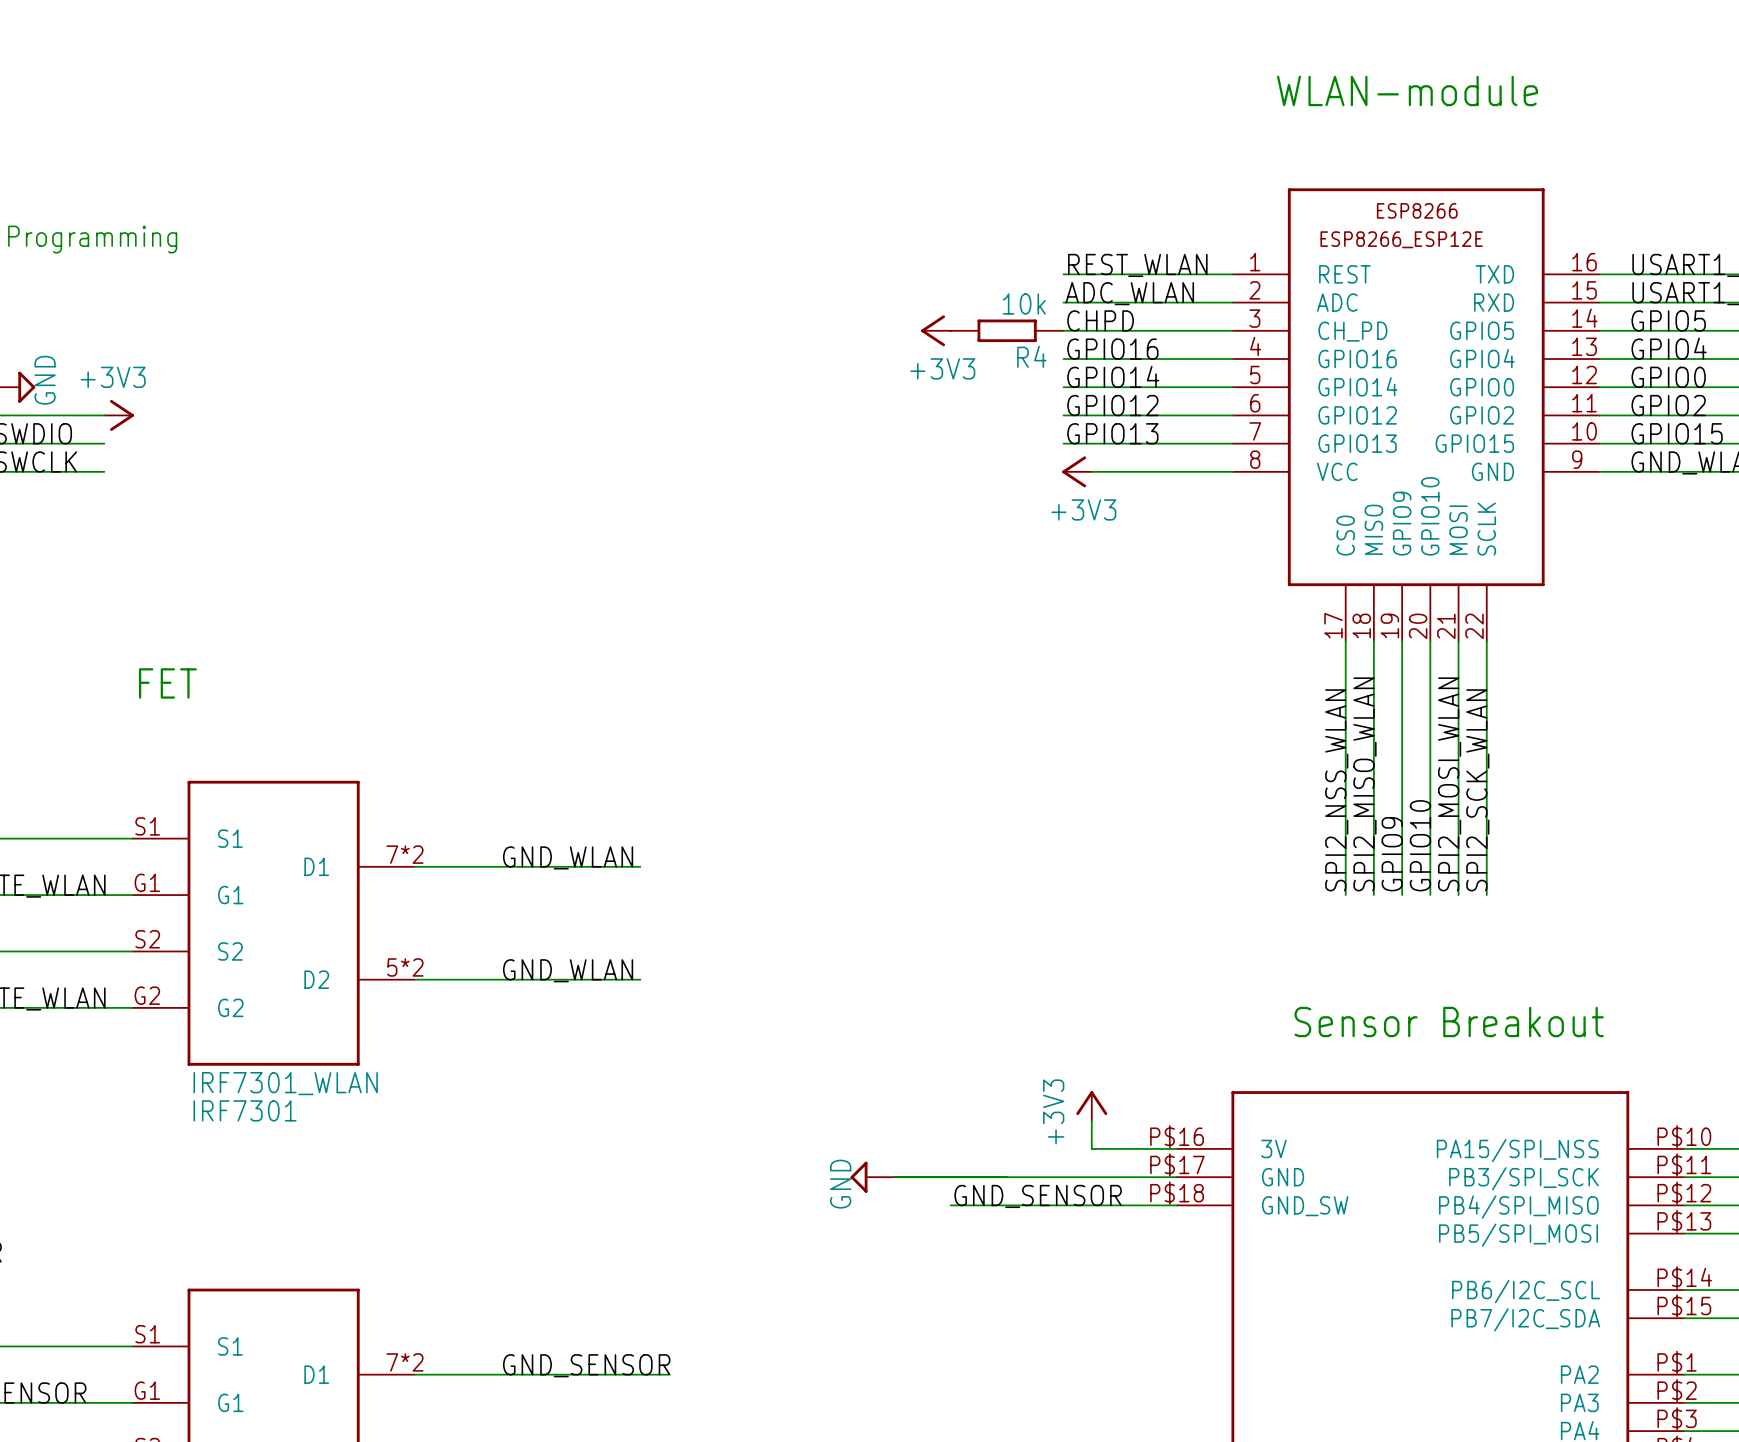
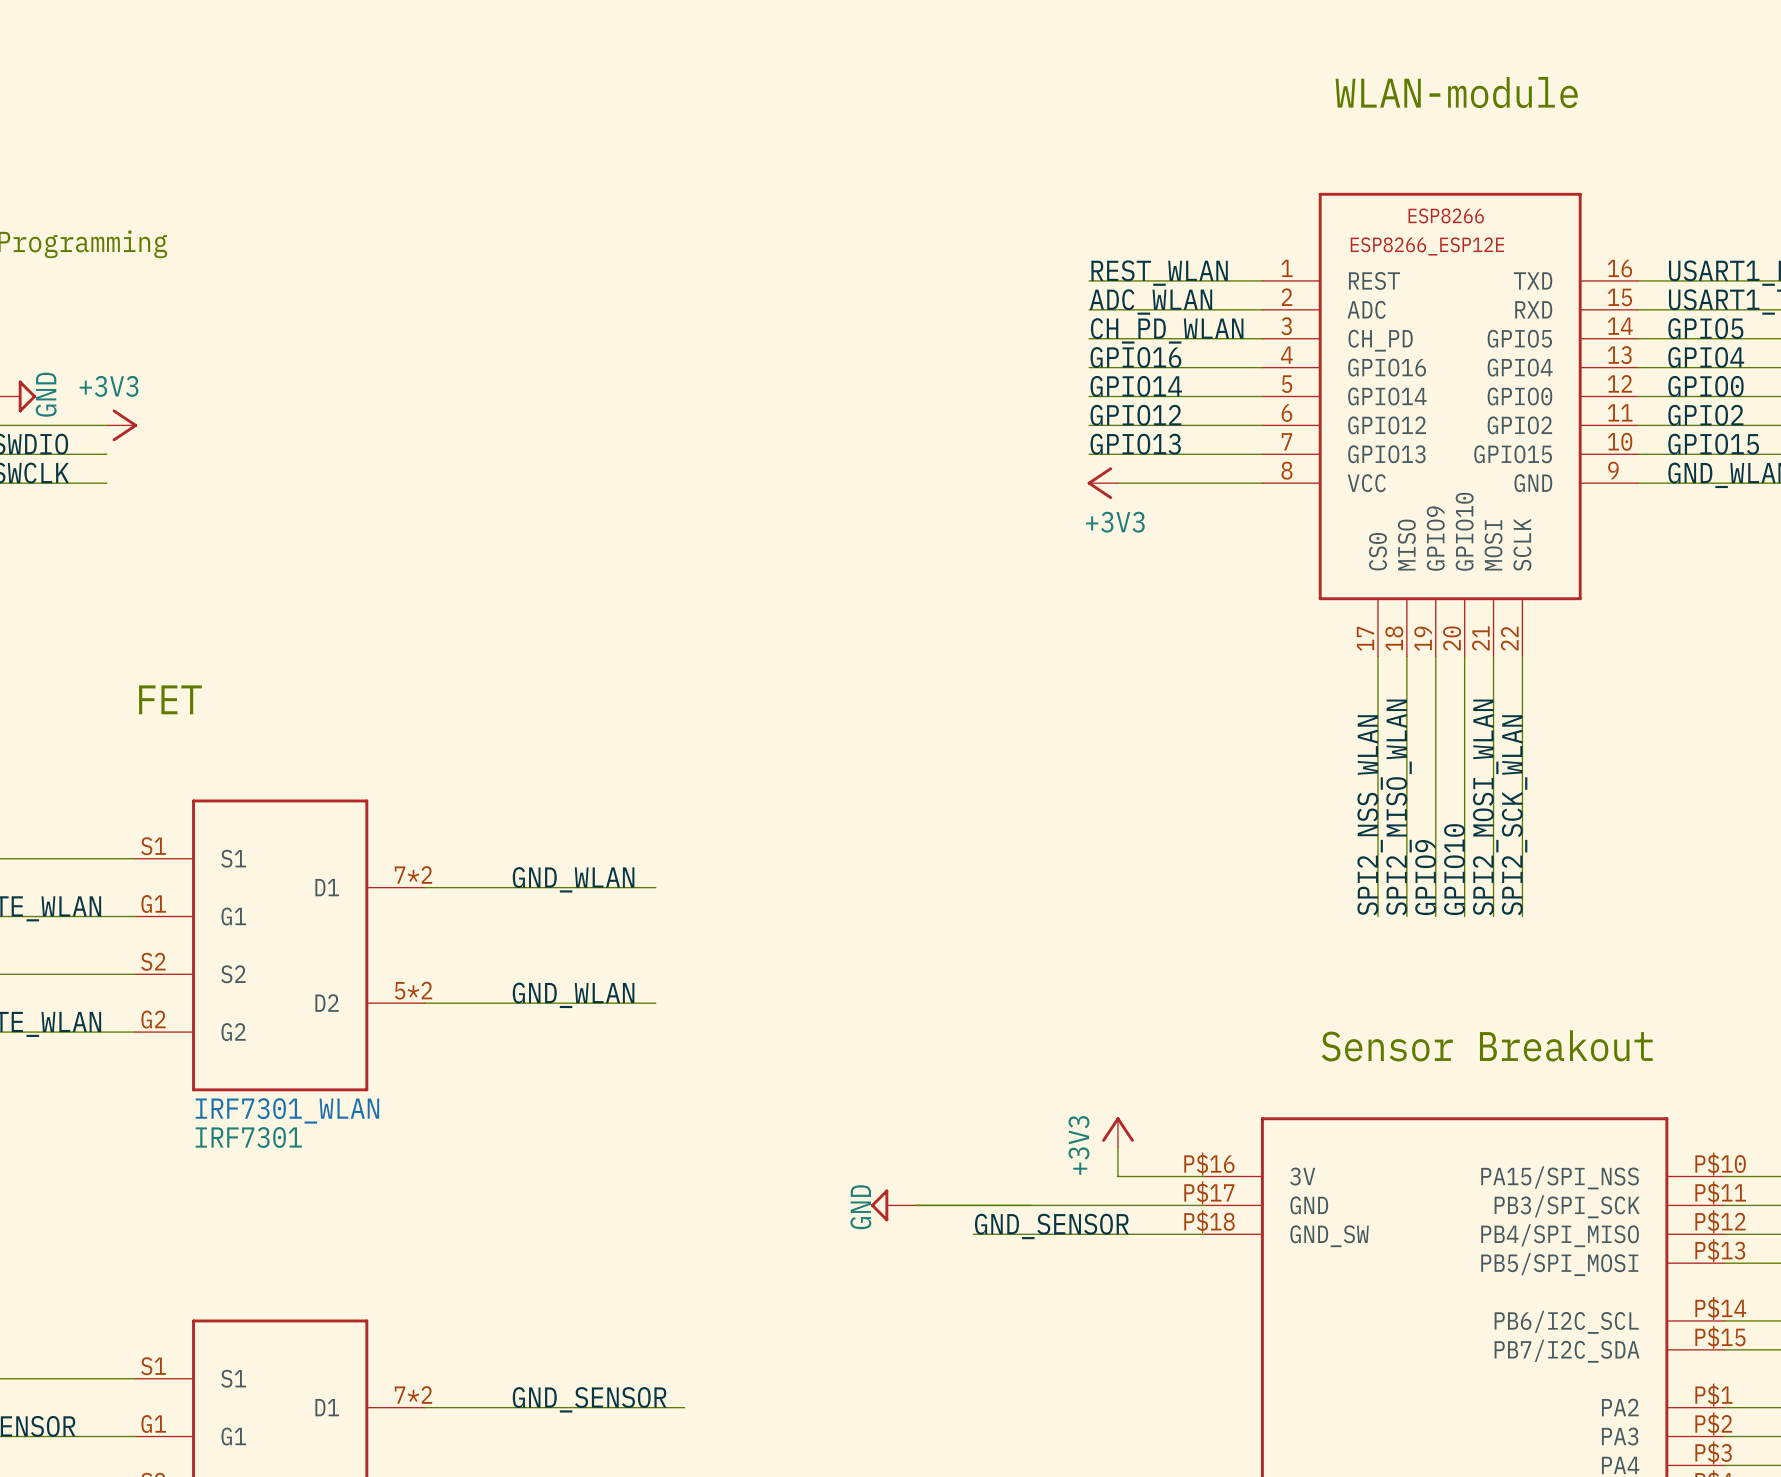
label: CHPD (1100, 320) -> CH_PD_WLAN (1167, 330)
power symbol: +3V3 (935, 330) -> none
R4: 10k (1007, 330) -> none

